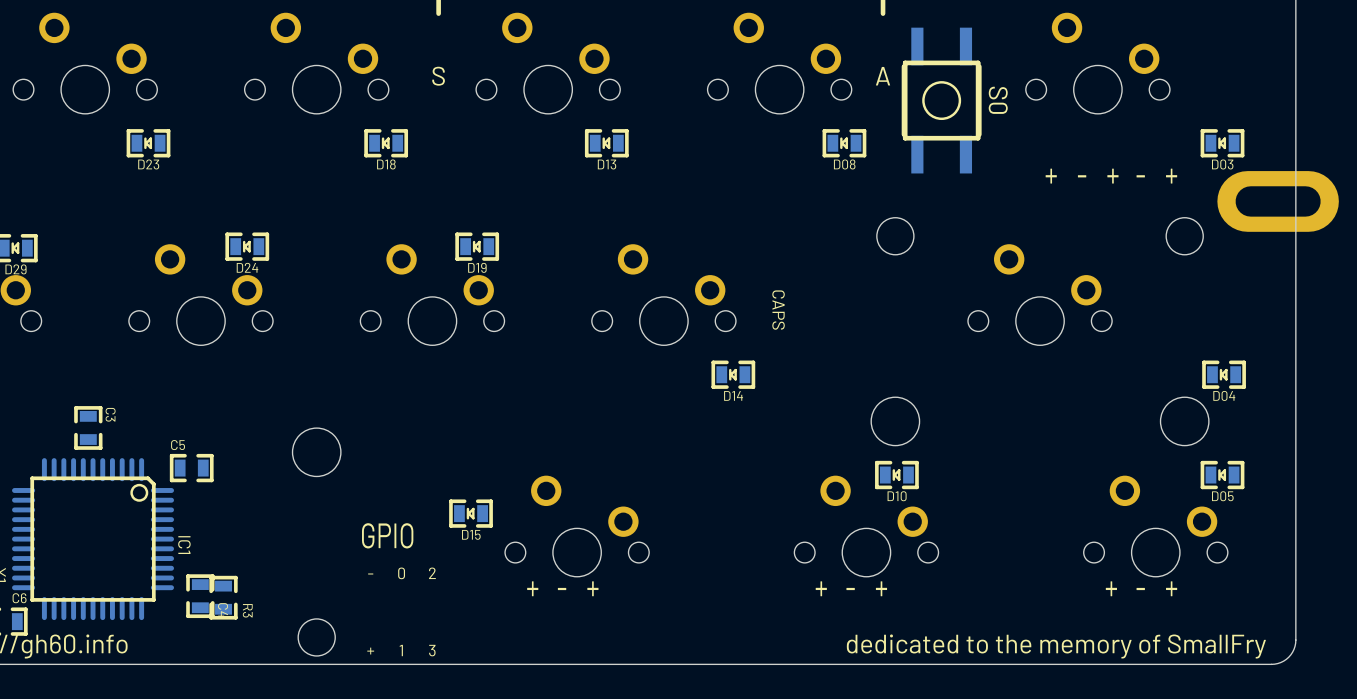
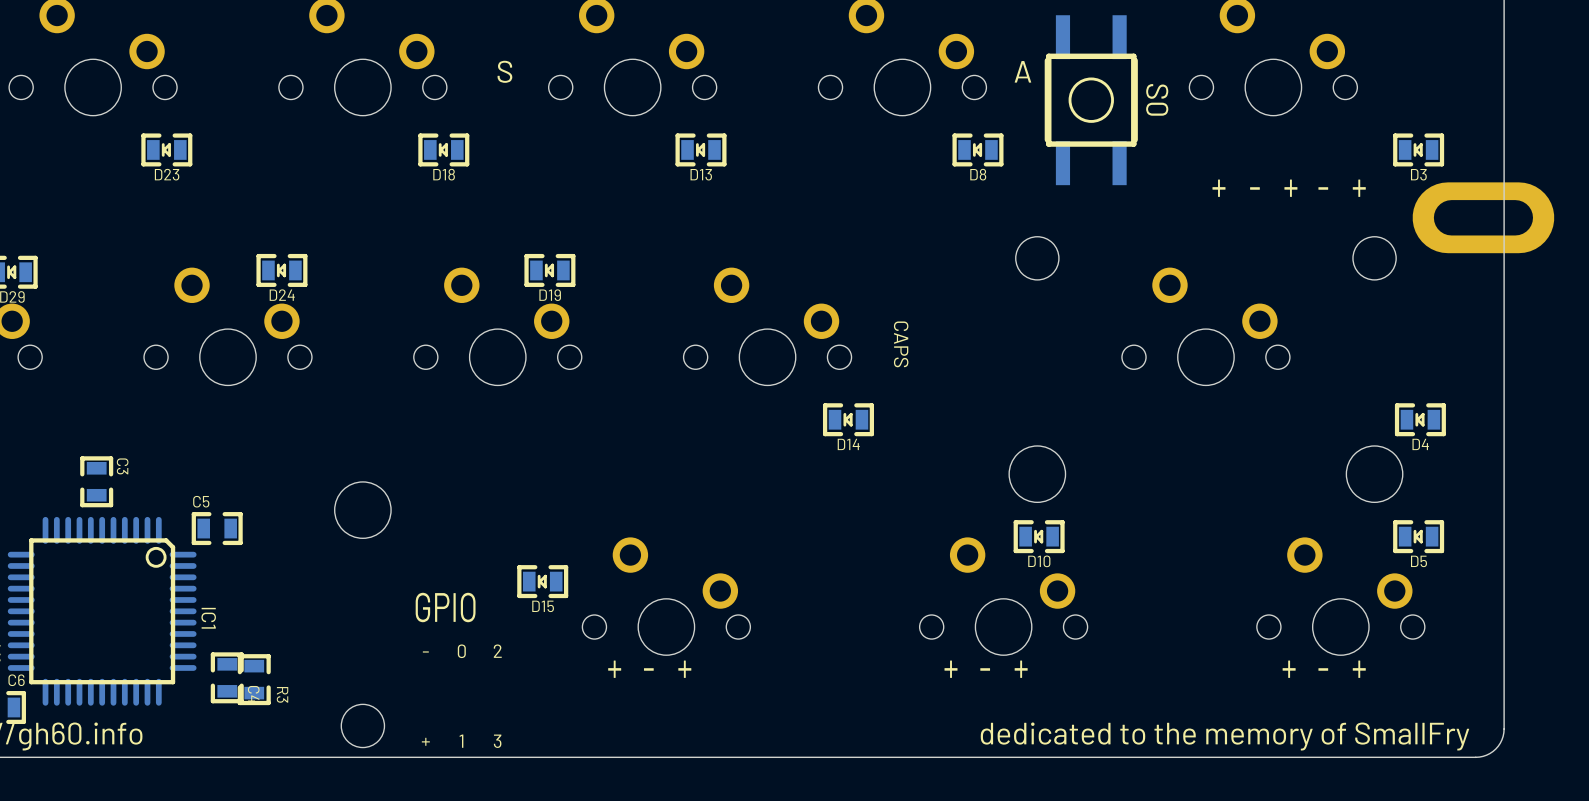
D08 name: D08 (844, 164) -> D8 (978, 174)
D03 name: D03 (1222, 164) -> D3 (1418, 174)
D04 name: D04 (1224, 395) -> D4 (1420, 444)
D05 name: D05 (1222, 496) -> D5 (1418, 561)

